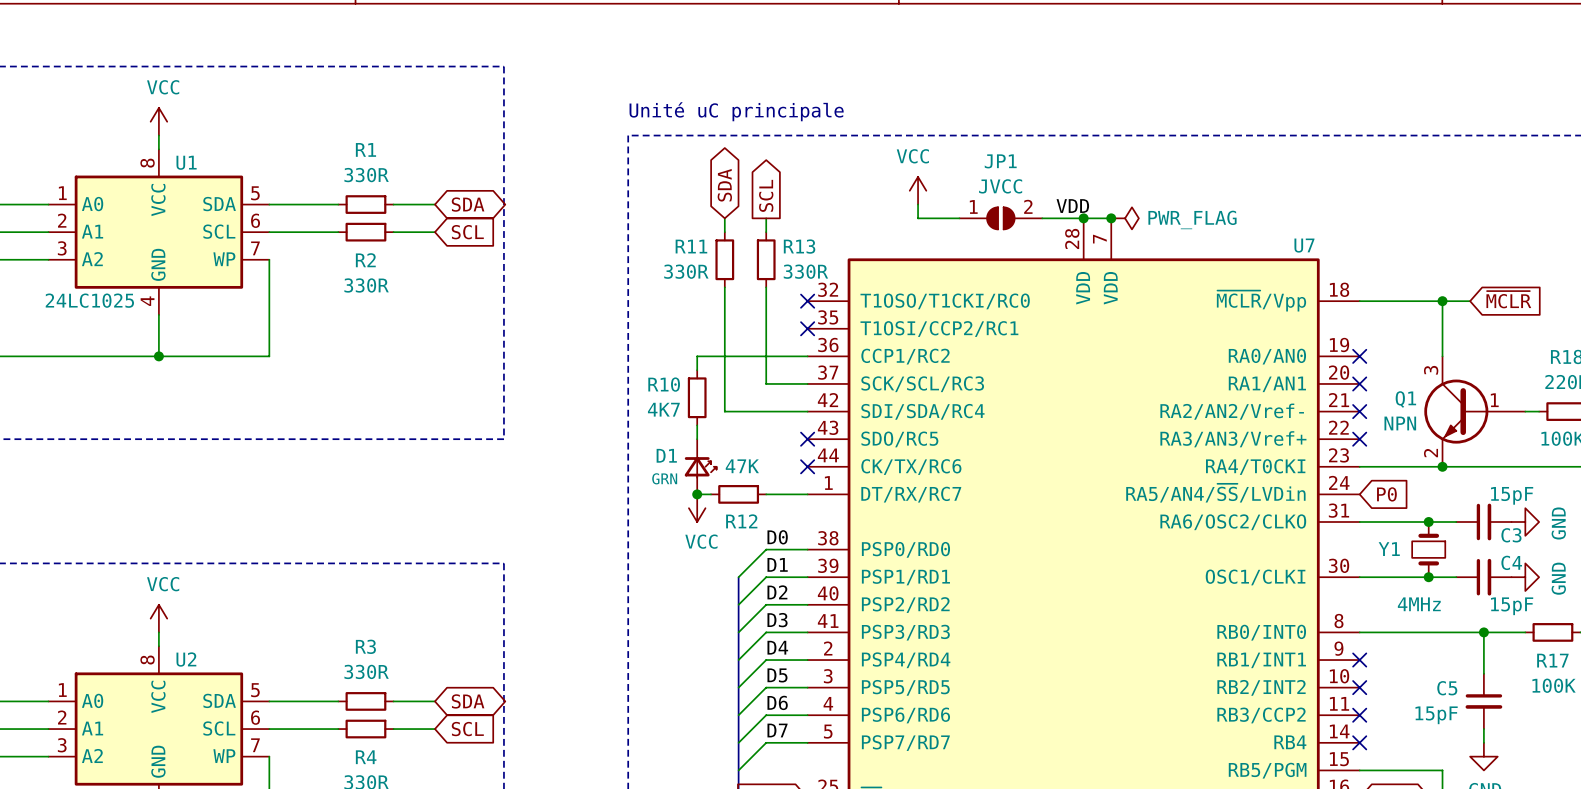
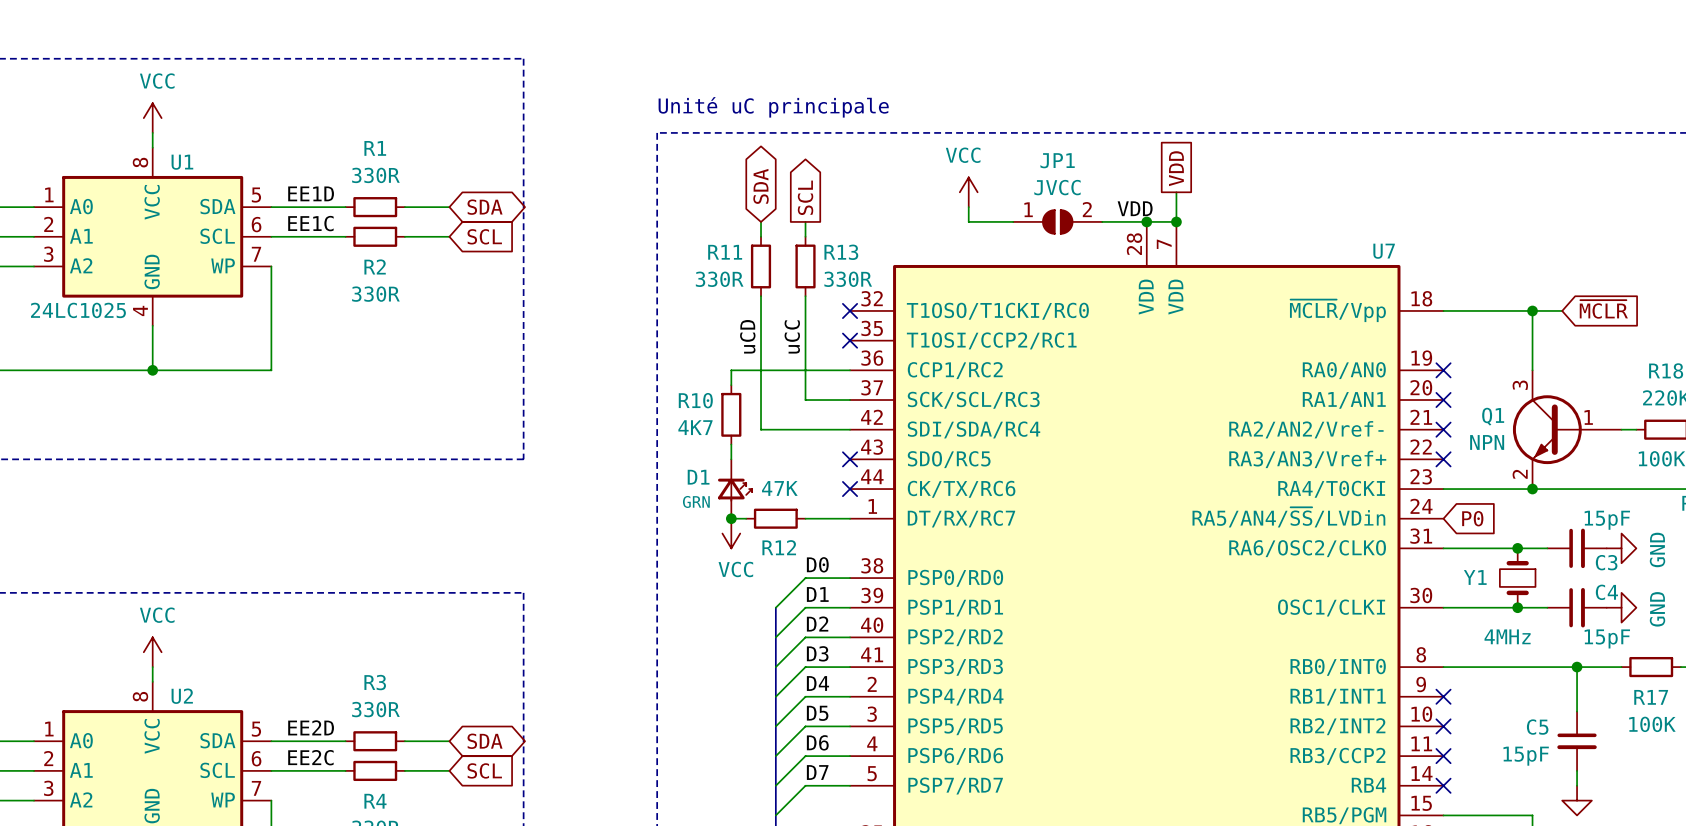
global label: none -> VDD (1176, 168)
wire: none -> (1176, 192) (1176, 221)
label: none -> EE1D (311, 193)
power symbol: PWR_FLAG (1125, 218) -> none
label: none -> EE1C (310, 223)
label: none -> uCD (747, 336)
label: none -> uCC (792, 336)
label: none -> EE2D (311, 727)
label: none -> EE2C (310, 757)

